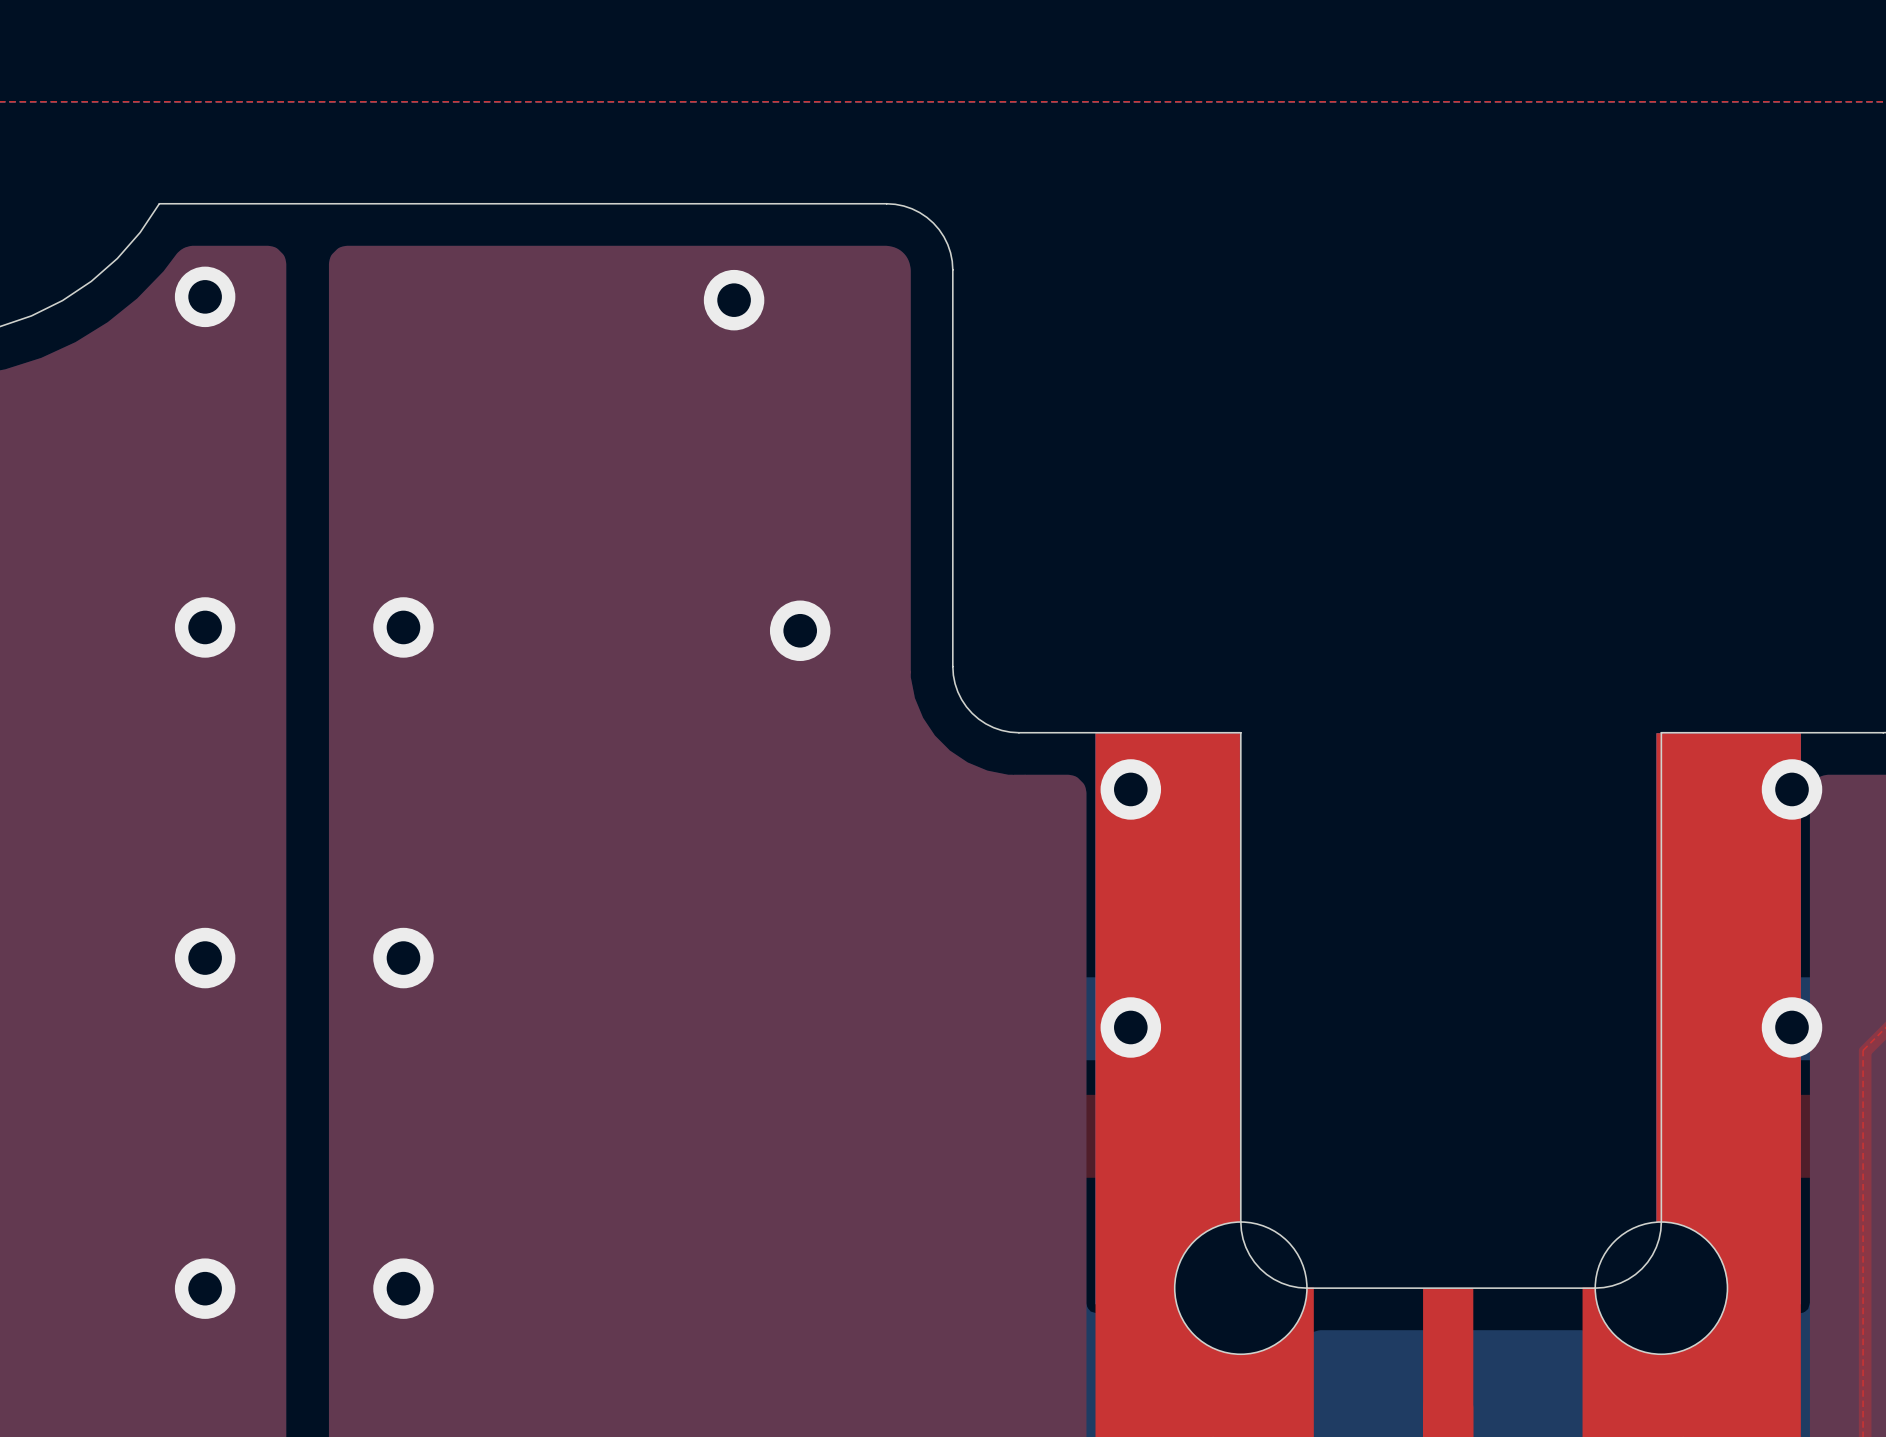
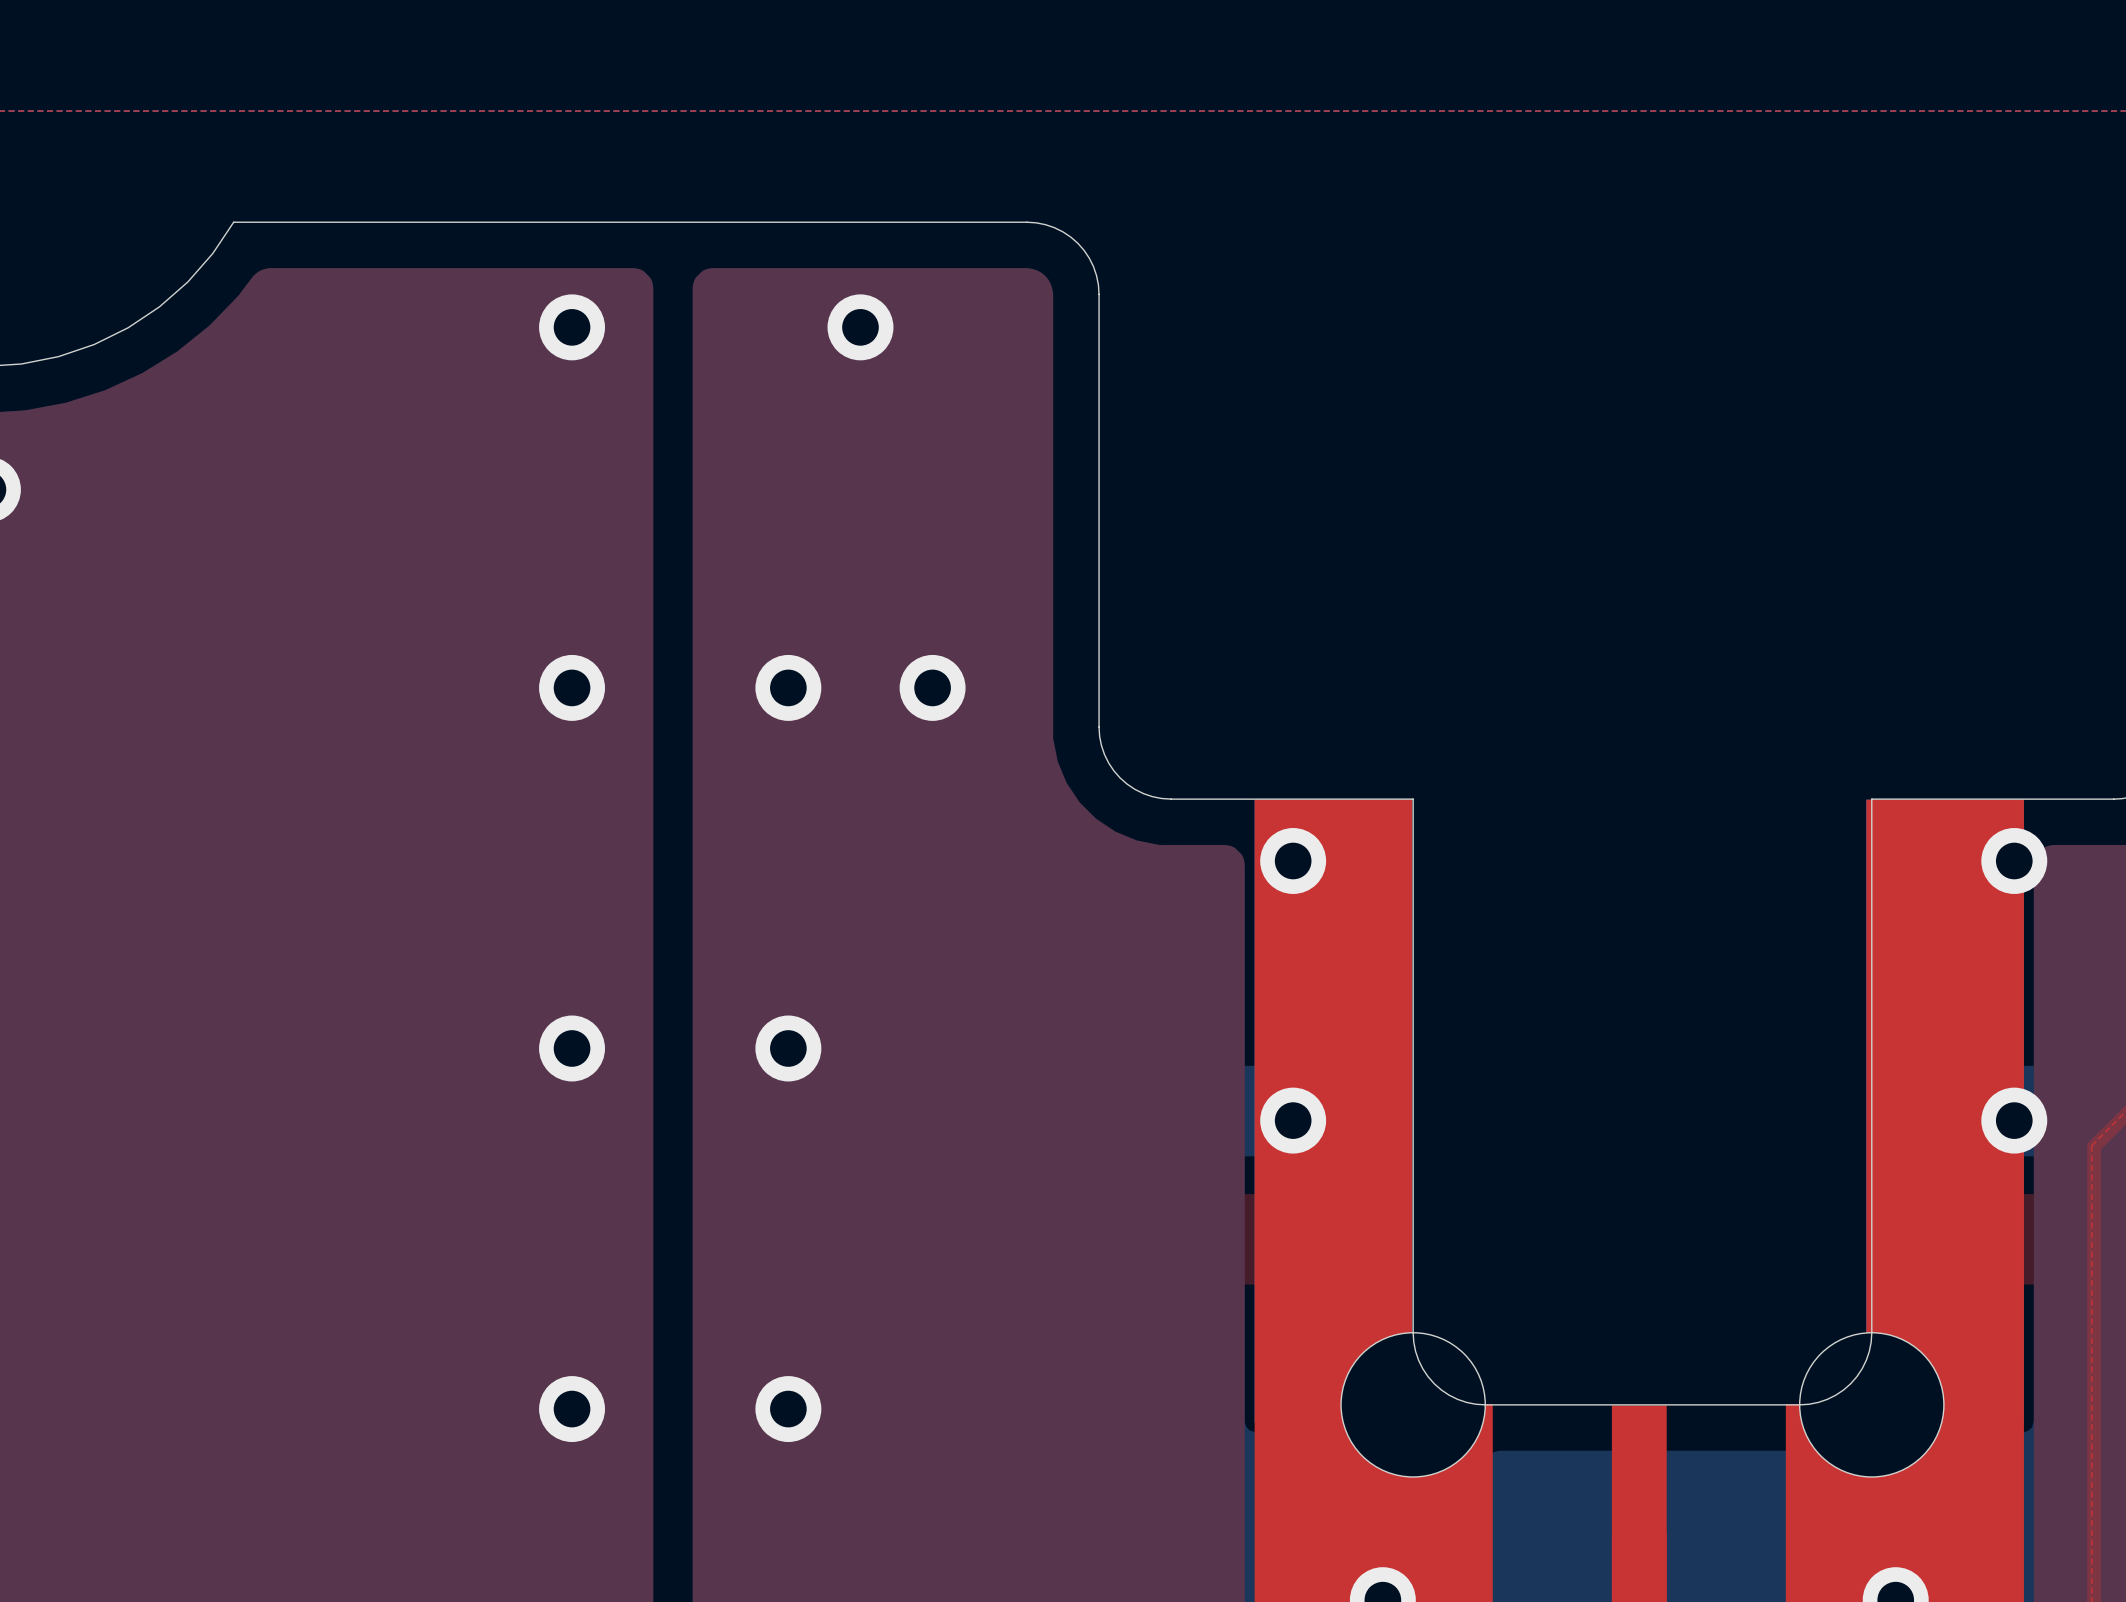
via: (205, 296) -> none
via: none -> (572, 327)
via: (205, 627) -> none
via position: (403, 627) -> (572, 687)
via: none -> (788, 687)
via: (205, 958) -> none
via position: (403, 958) -> (572, 1048)
via: none -> (788, 1048)
via: (205, 1288) -> none
via position: (403, 1288) -> (572, 1409)
via: none -> (788, 1409)

